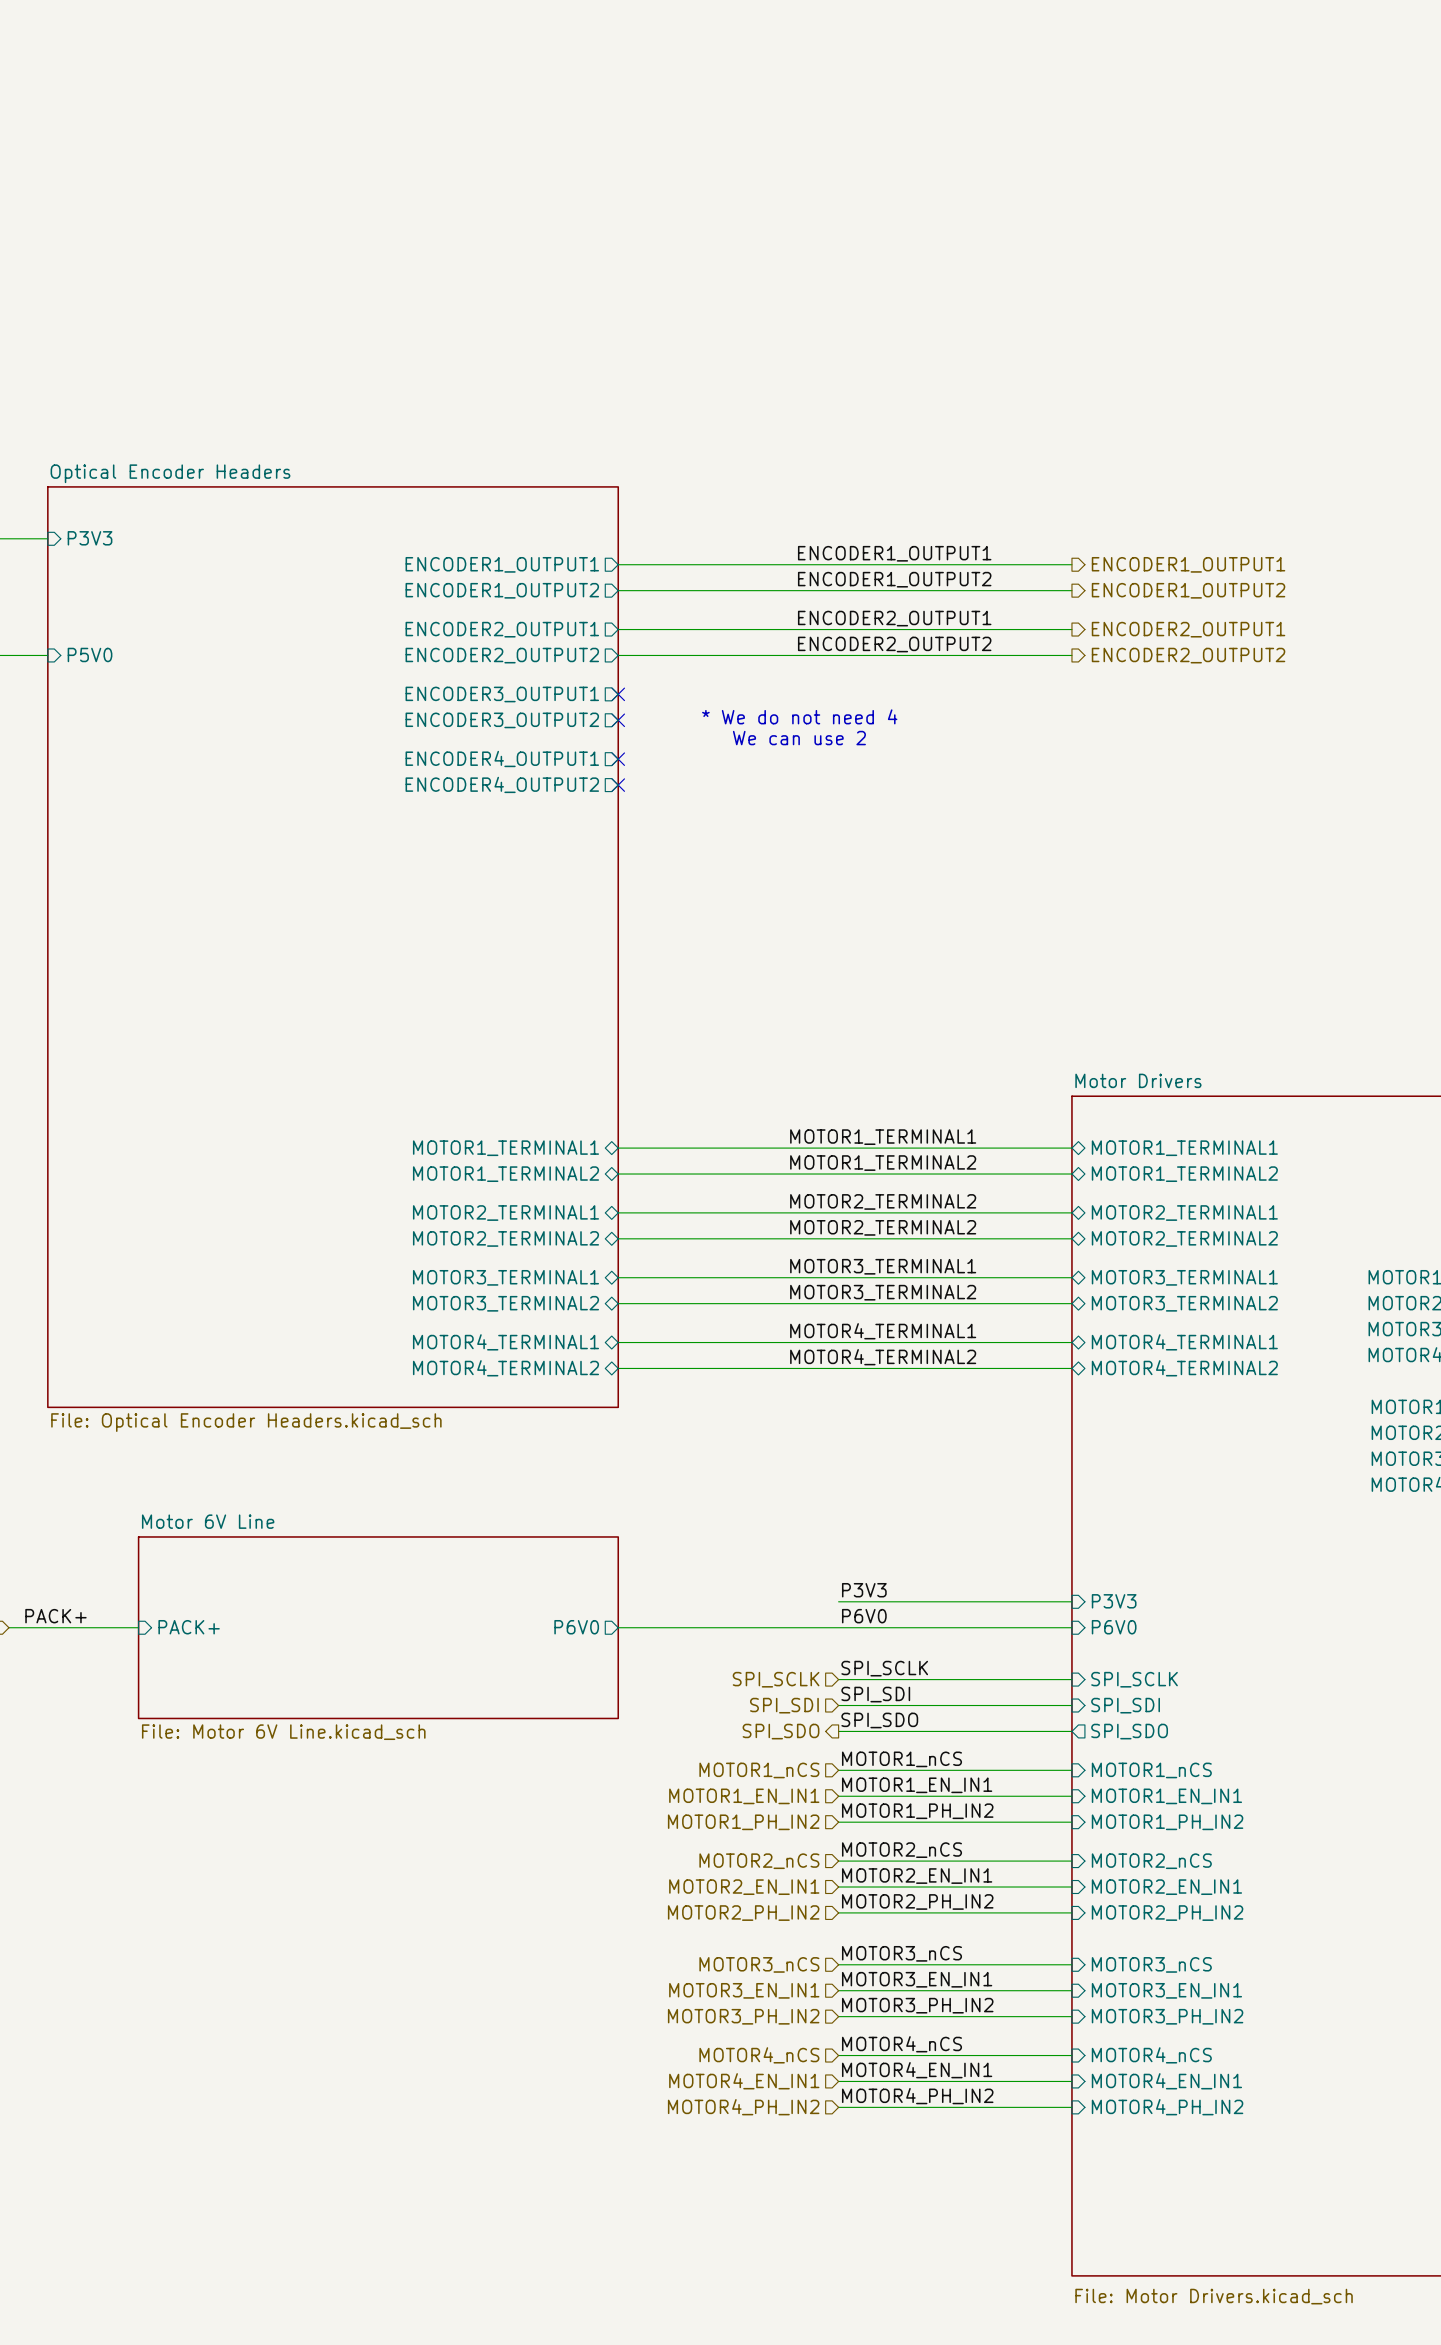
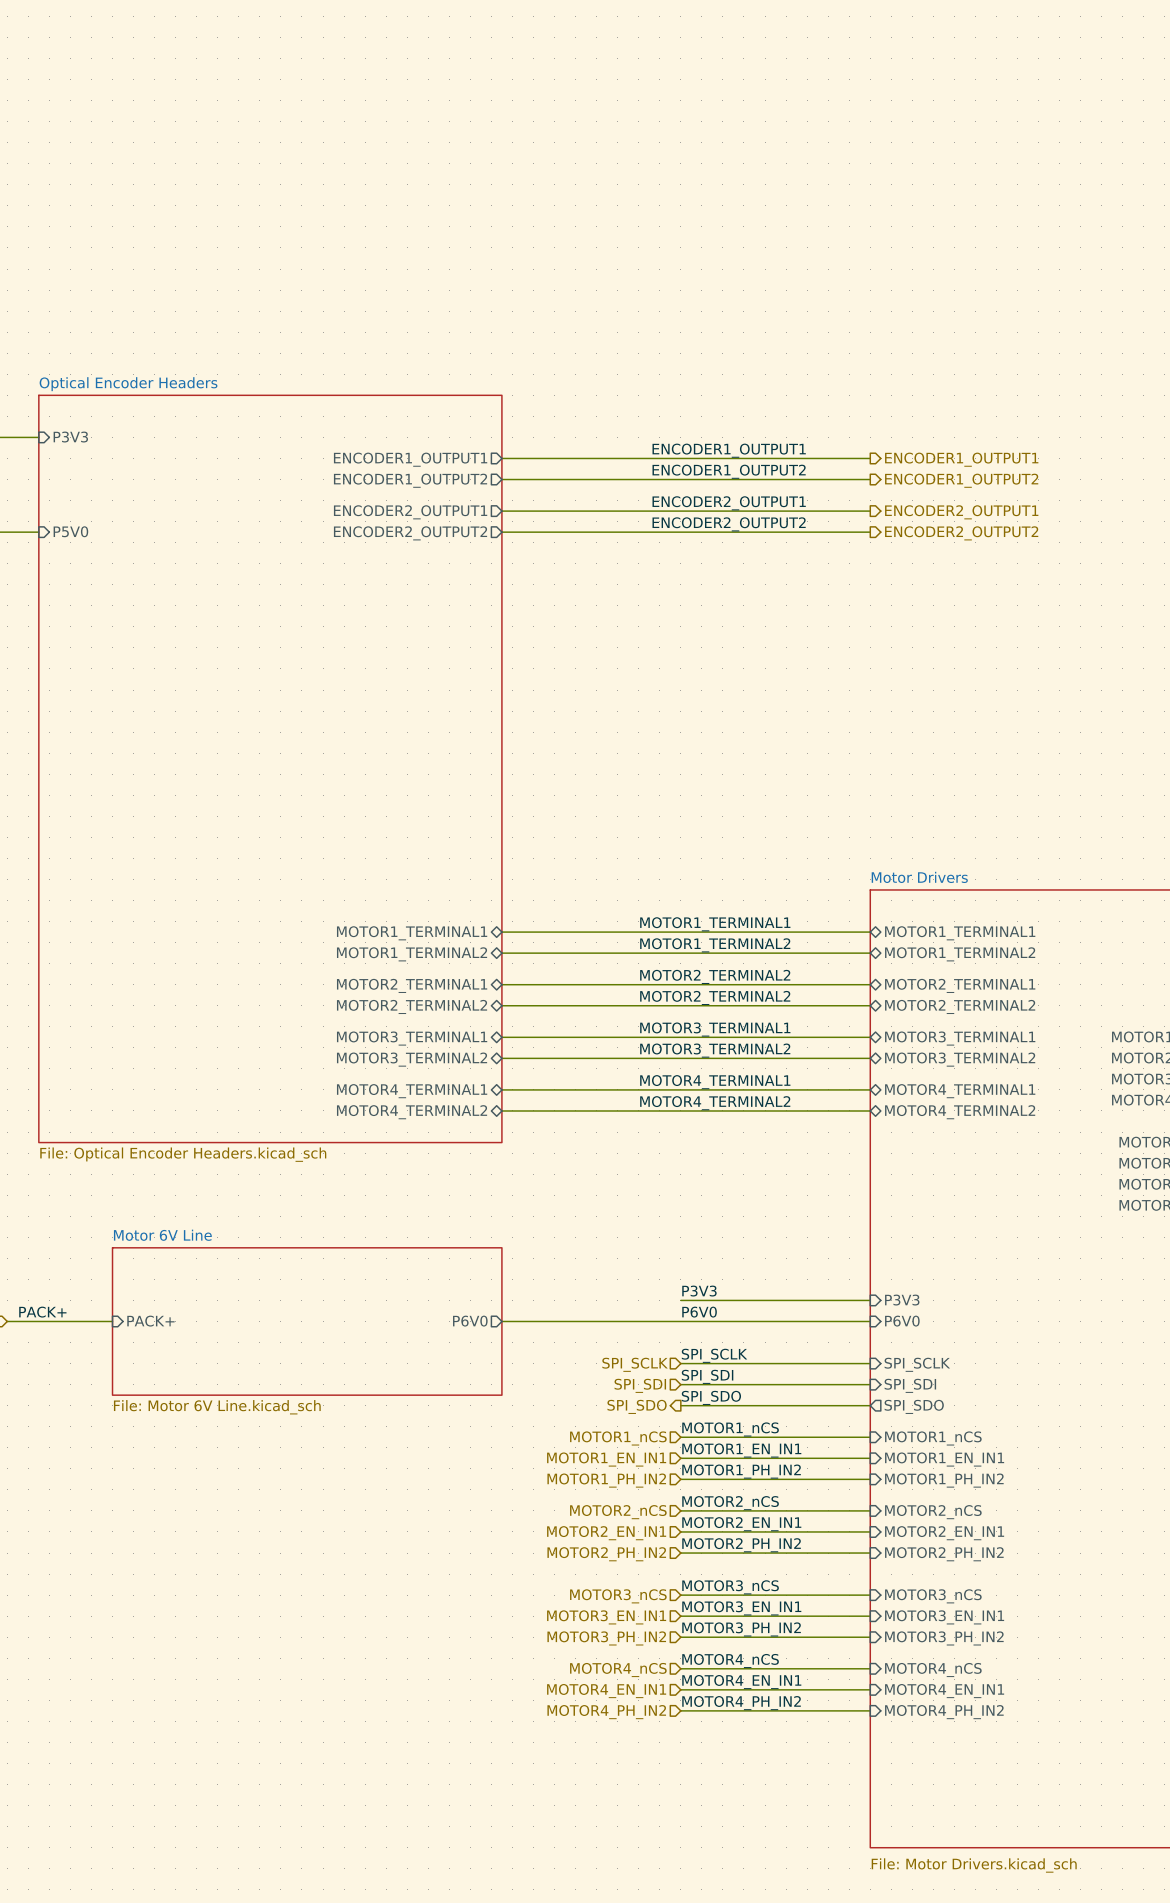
sheet pin: ENCODER3_OUTPUT1 (502, 694) -> none
no-connect mark: (618, 694) -> none
text: * We do not need 4 (799, 716) -> none
sheet pin: ENCODER3_OUTPUT2 (502, 720) -> none
no-connect mark: (618, 720) -> none
text: We can use 2 (799, 738) -> none
sheet pin: ENCODER4_OUTPUT1 (502, 758) -> none
no-connect mark: (618, 759) -> none
sheet pin: ENCODER4_OUTPUT2 (502, 784) -> none
no-connect mark: (618, 785) -> none

